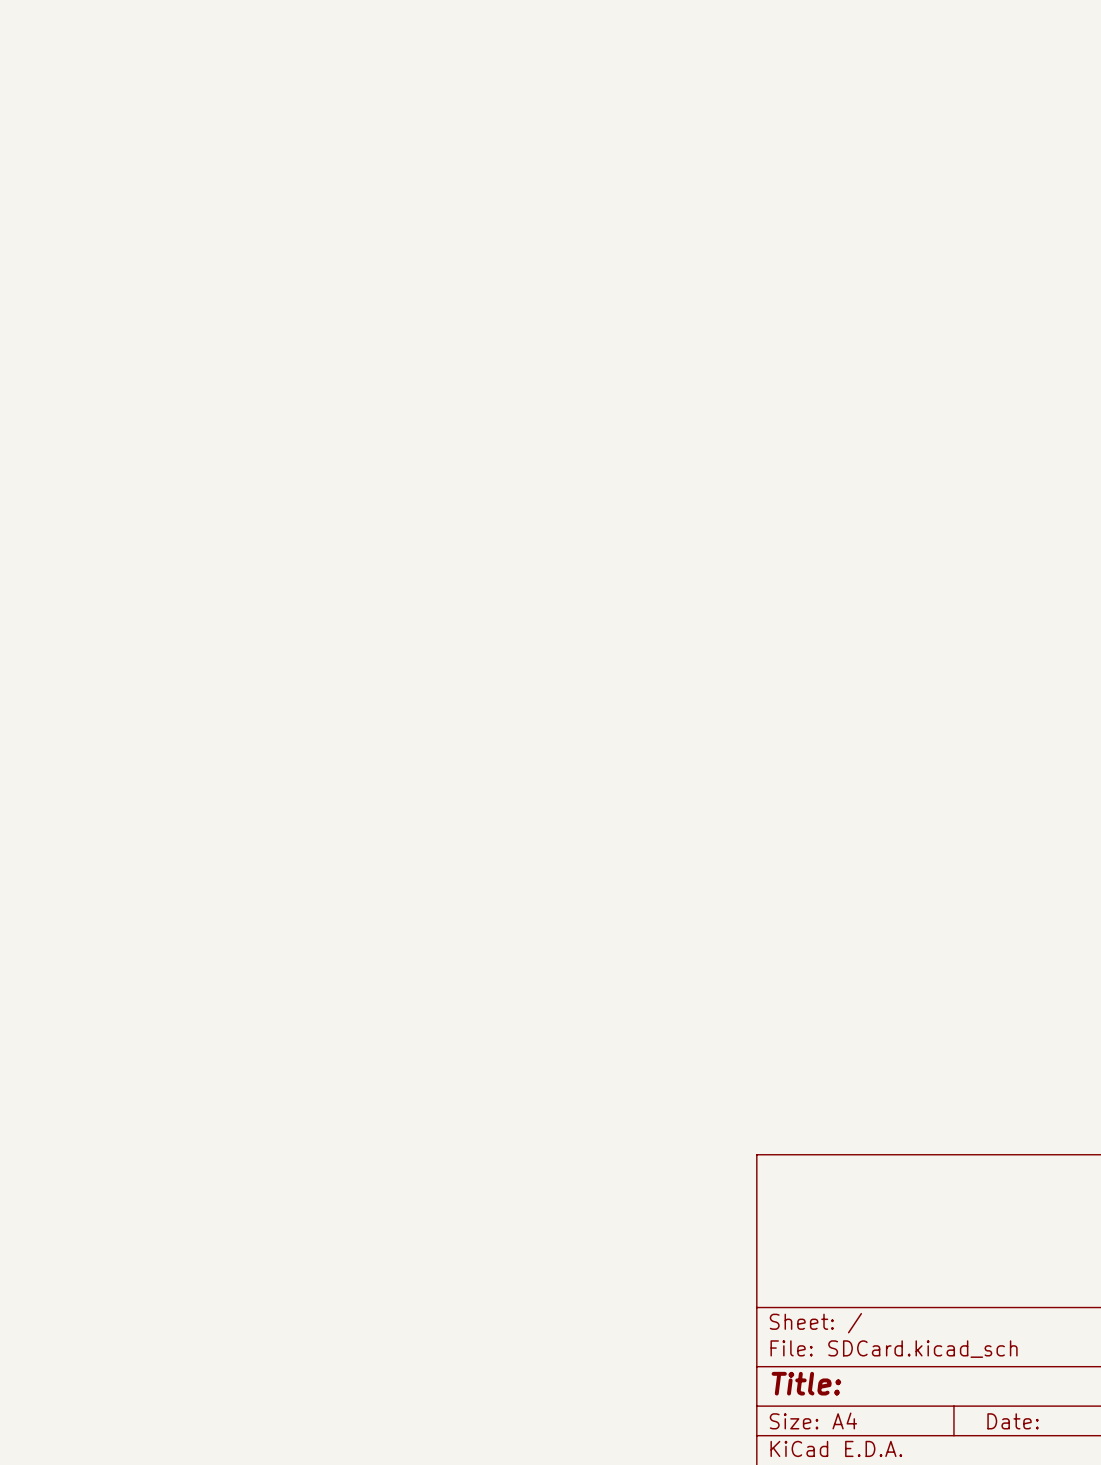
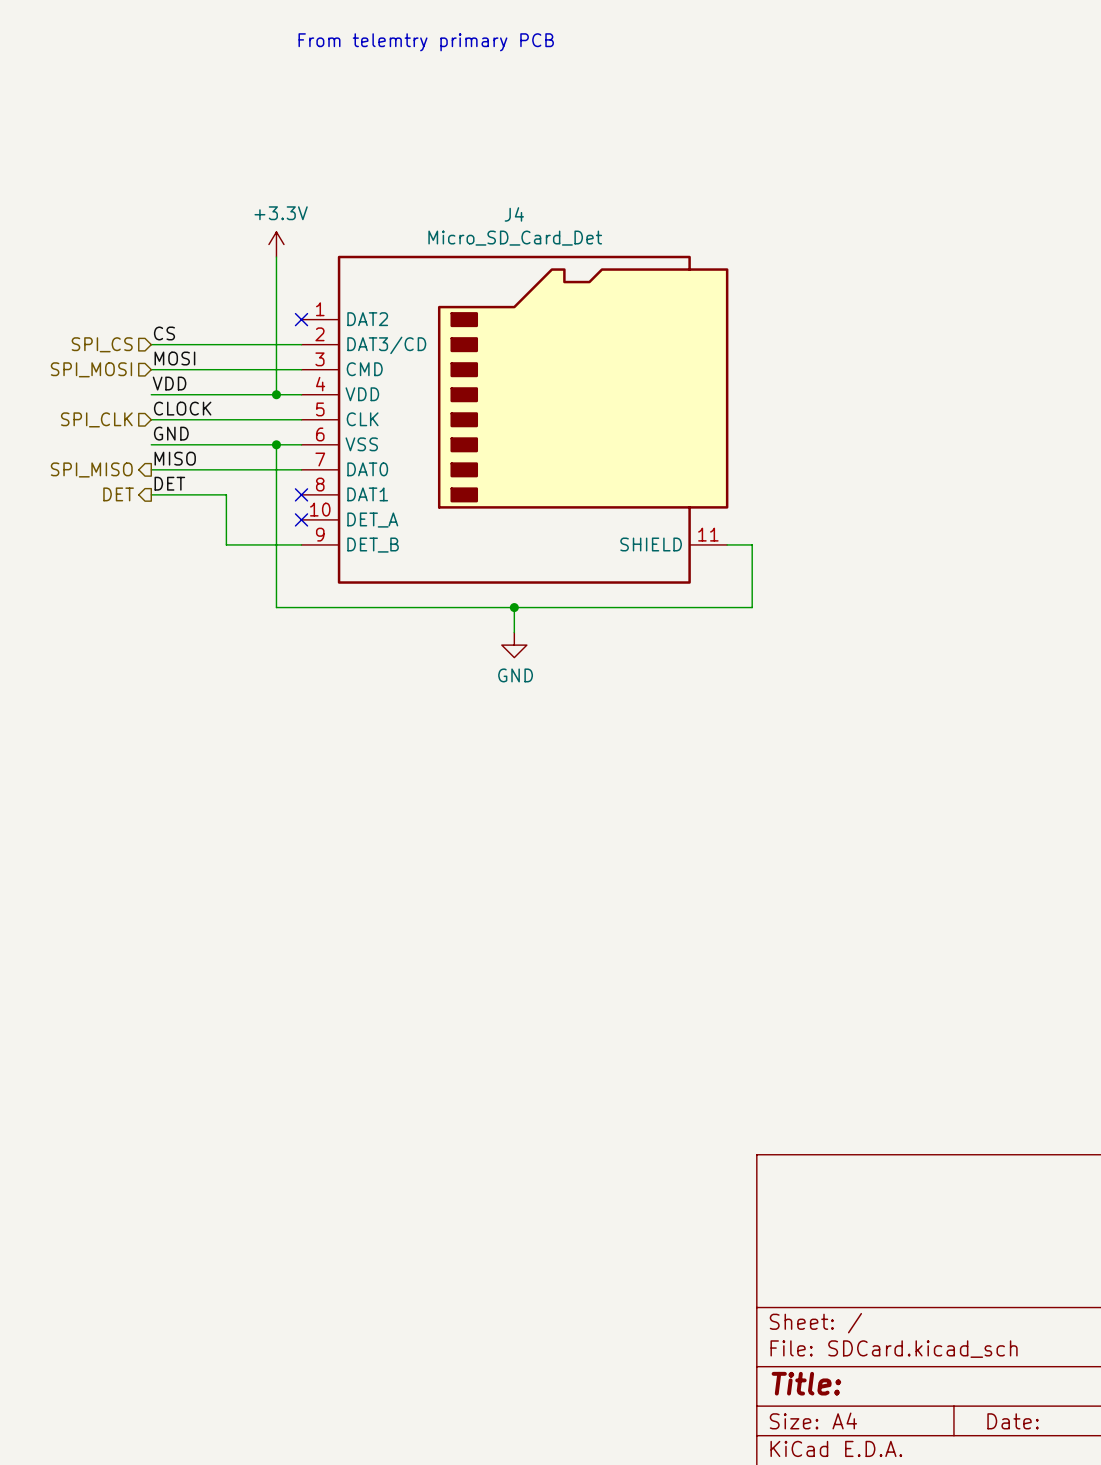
text: none -> From telemtry primary PCB (426, 42)
power symbol: none -> +3.3V (276, 244)
wire: none -> (276, 257) (276, 394)
no-connect mark: none -> (301, 319)
label: none -> CS (164, 333)
hierarchical label: none -> SPI_CS (102, 344)
wire: none -> (151, 344) (301, 344)
label: none -> MOSI (174, 358)
hierarchical label: none -> SPI_MOSI (91, 369)
wire: none -> (151, 369) (301, 369)
label: none -> VDD (169, 383)
wire: none -> (151, 394) (301, 394)
junction: none -> (276, 394)
label: none -> CLOCK (182, 408)
hierarchical label: none -> SPI_CLK (96, 419)
wire: none -> (151, 419) (301, 419)
J4: none -> Micro_SD_Card_Det (514, 419)
label: none -> GND (171, 433)
wire: none -> (151, 444) (301, 444)
wire: none -> (276, 444) (276, 607) (752, 607) (752, 544) (727, 544)
junction: none -> (276, 444)
label: none -> MISO (175, 458)
hierarchical label: none -> SPI_MISO (91, 469)
wire: none -> (151, 469) (301, 469)
label: none -> DET (169, 483)
hierarchical label: none -> DET (118, 494)
wire: none -> (151, 494) (226, 494) (226, 544) (301, 544)
no-connect mark: none -> (301, 494)
no-connect mark: none -> (301, 519)
wire: none -> (514, 607) (514, 632)
junction: none -> (514, 607)
power symbol: none -> GND (514, 645)

